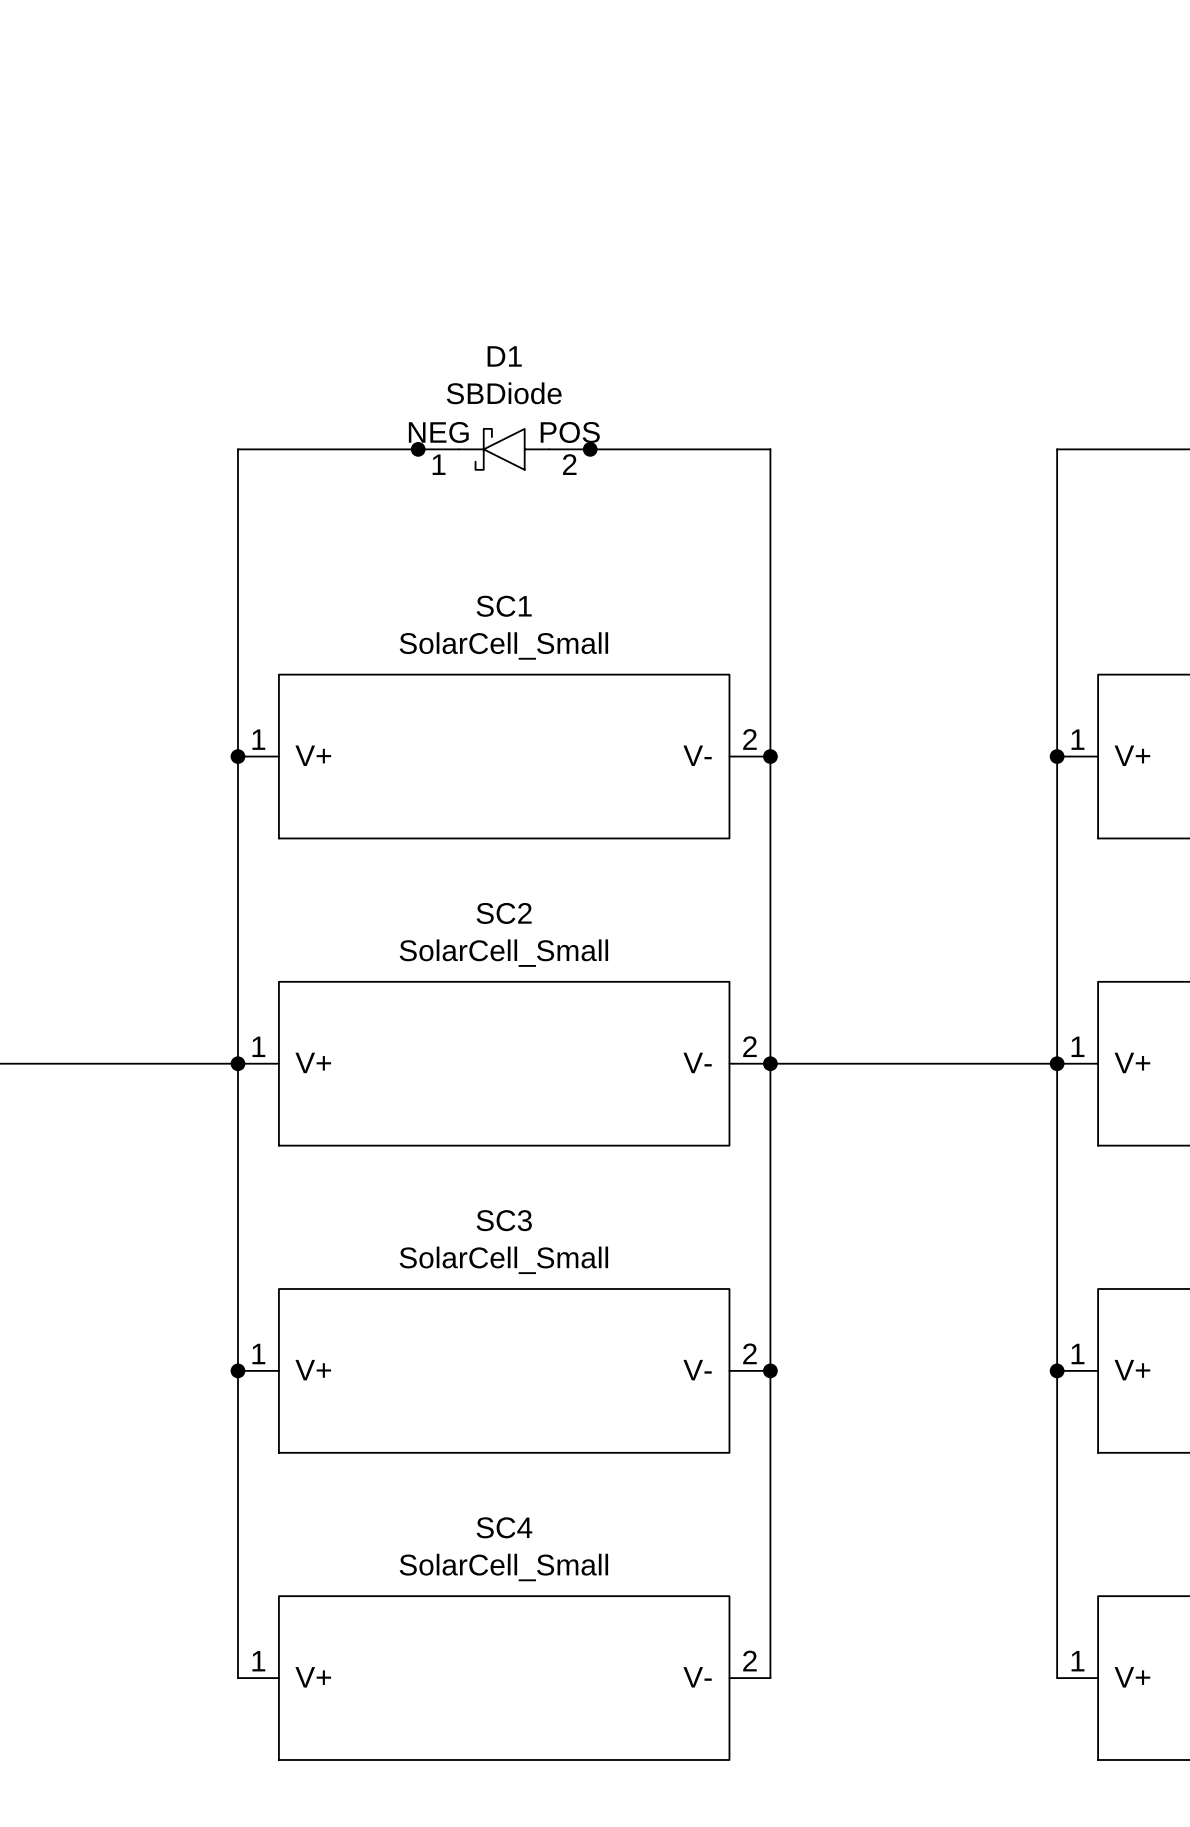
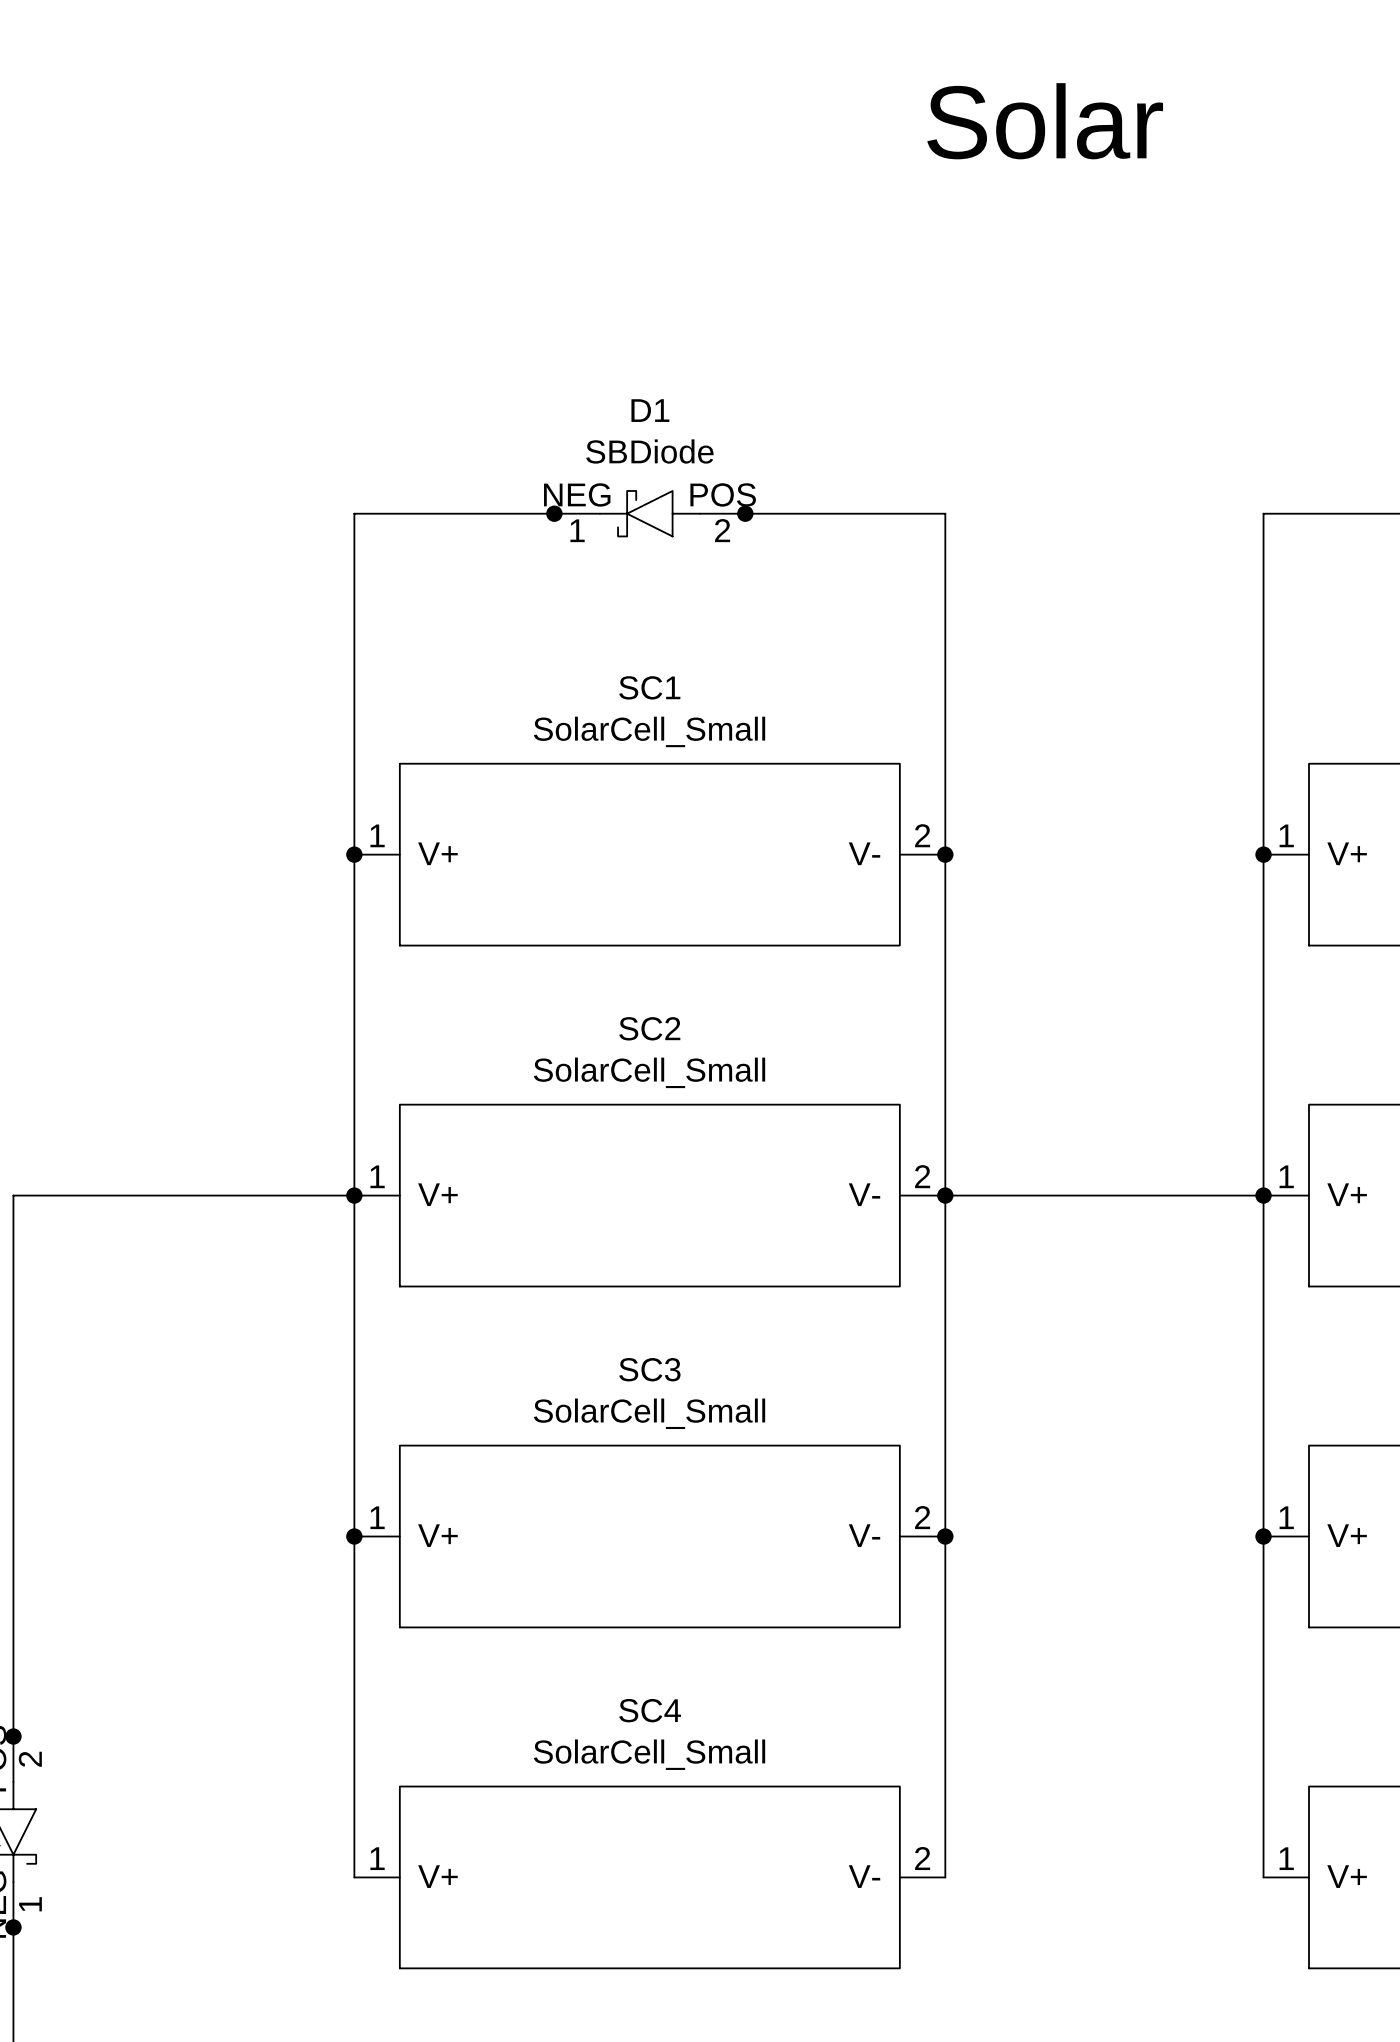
text: none -> Solar (1045, 121)

